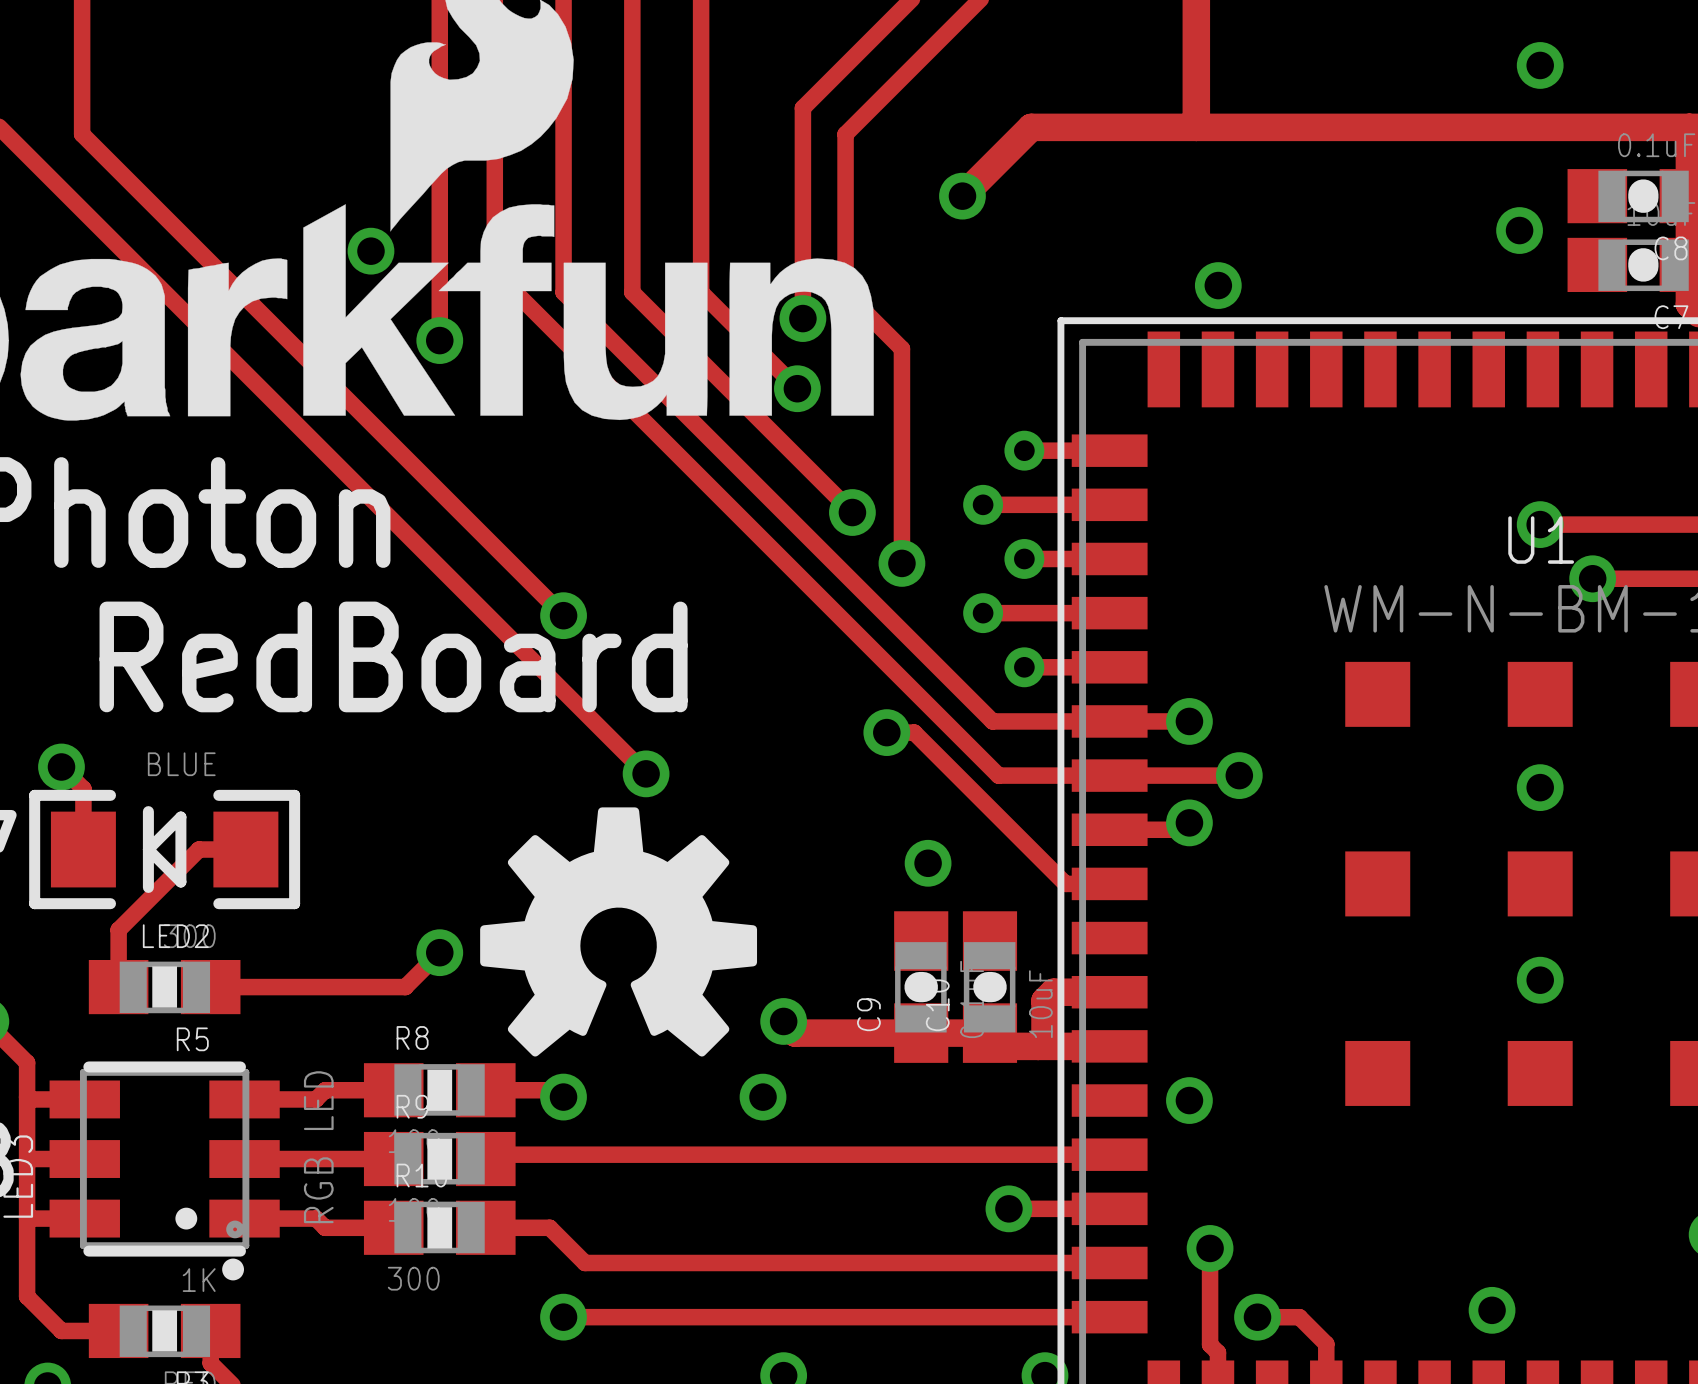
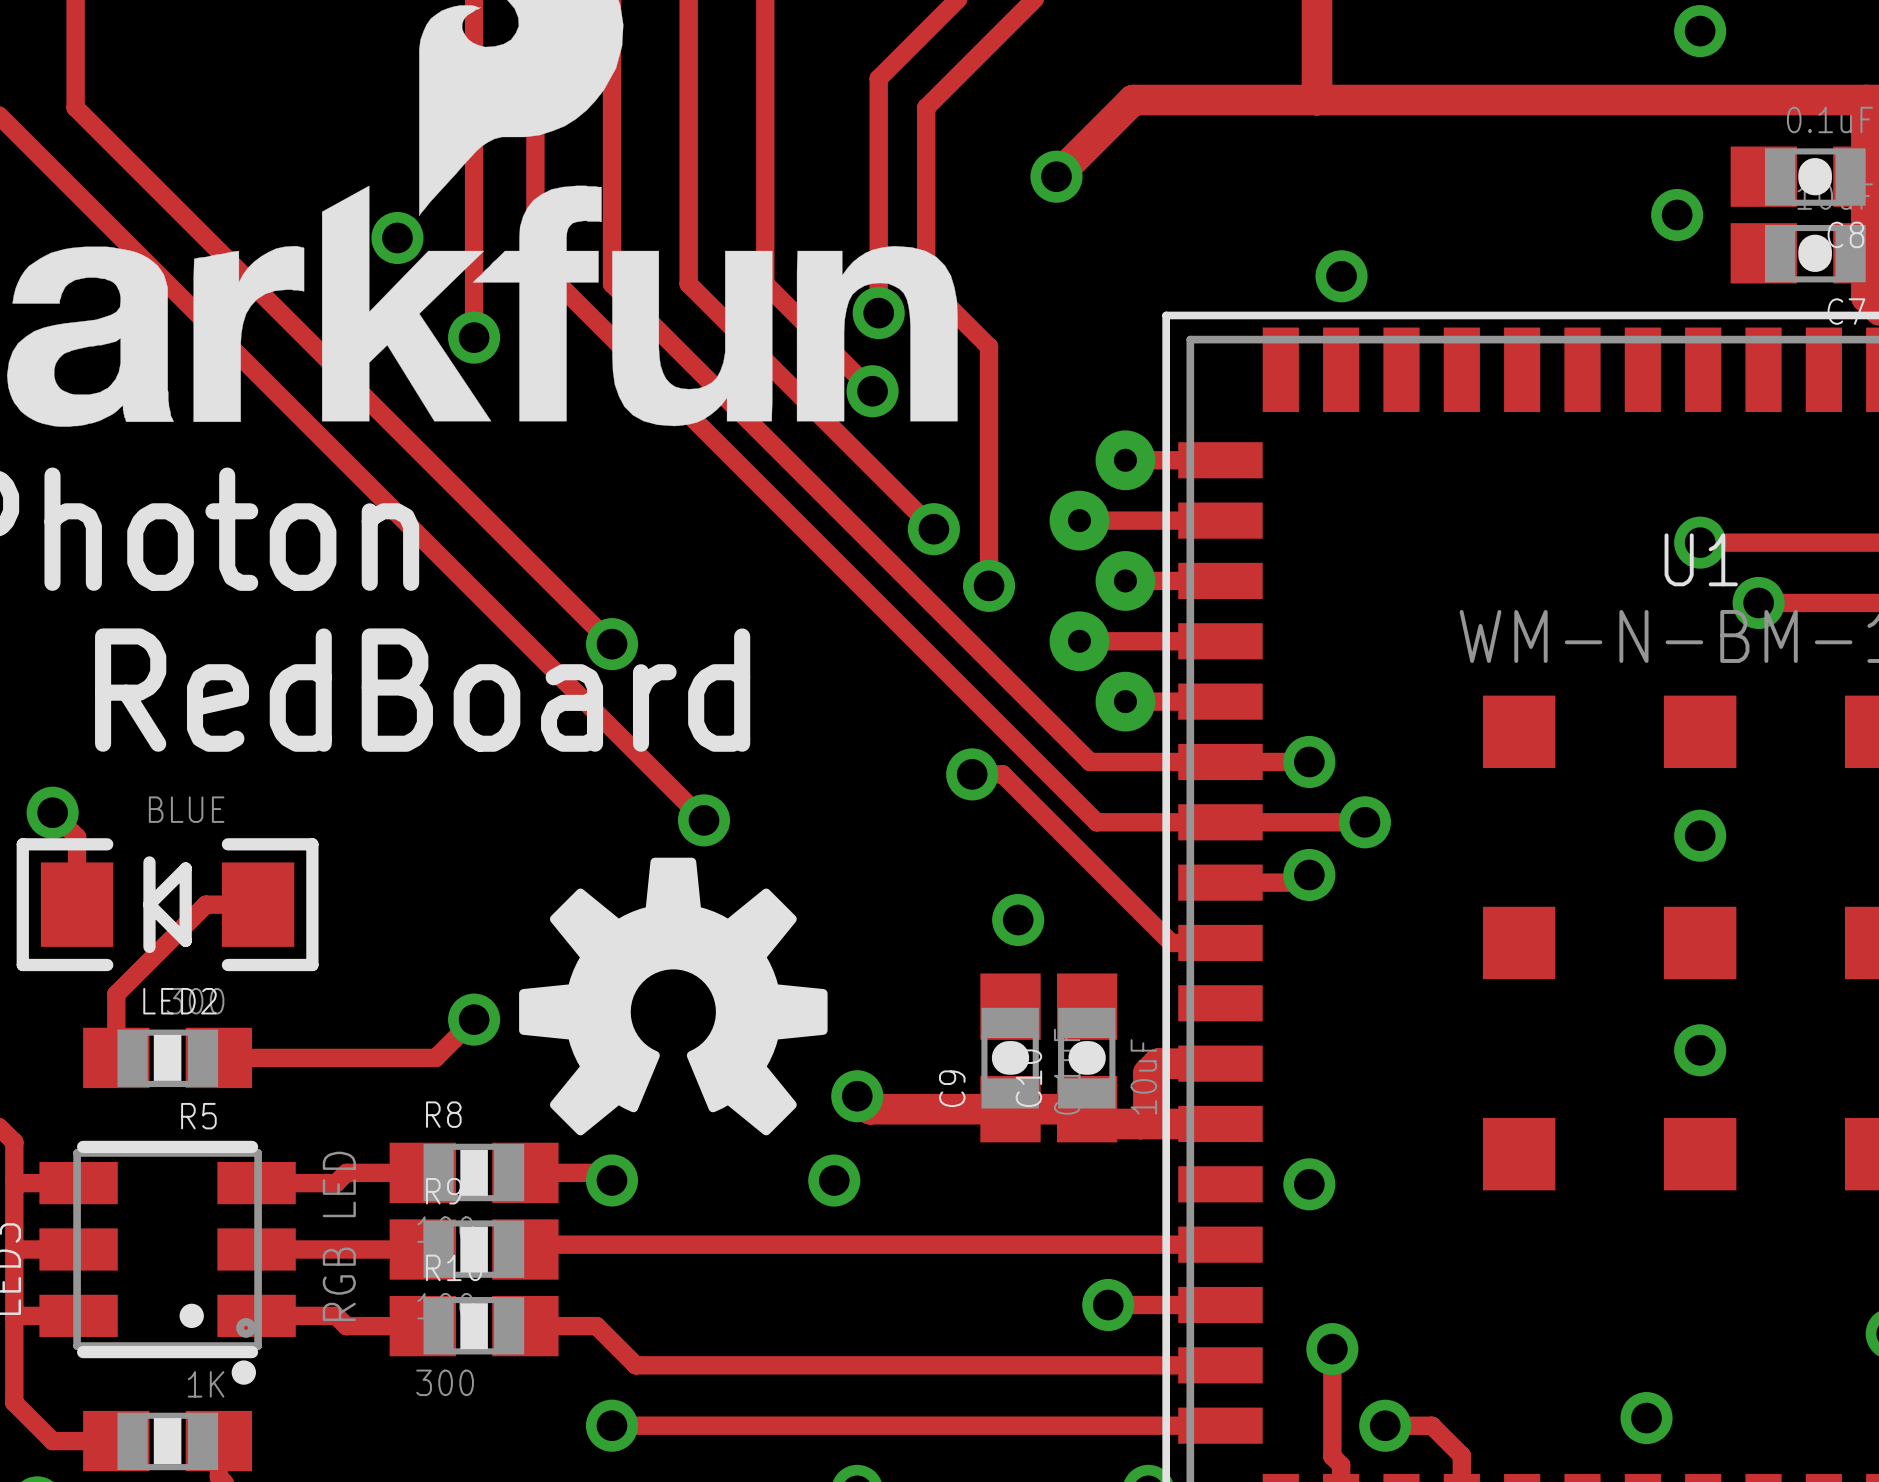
part footprint: [1004, 430, 1045, 471] -> [1095, 430, 1156, 491]
part footprint: [963, 484, 1004, 525] -> [1049, 490, 1110, 551]
part footprint: [1004, 539, 1045, 579] -> [1095, 551, 1156, 611]
part footprint: [963, 593, 1004, 634] -> [1049, 611, 1110, 672]
part footprint: [1004, 647, 1045, 688] -> [1095, 671, 1156, 732]

